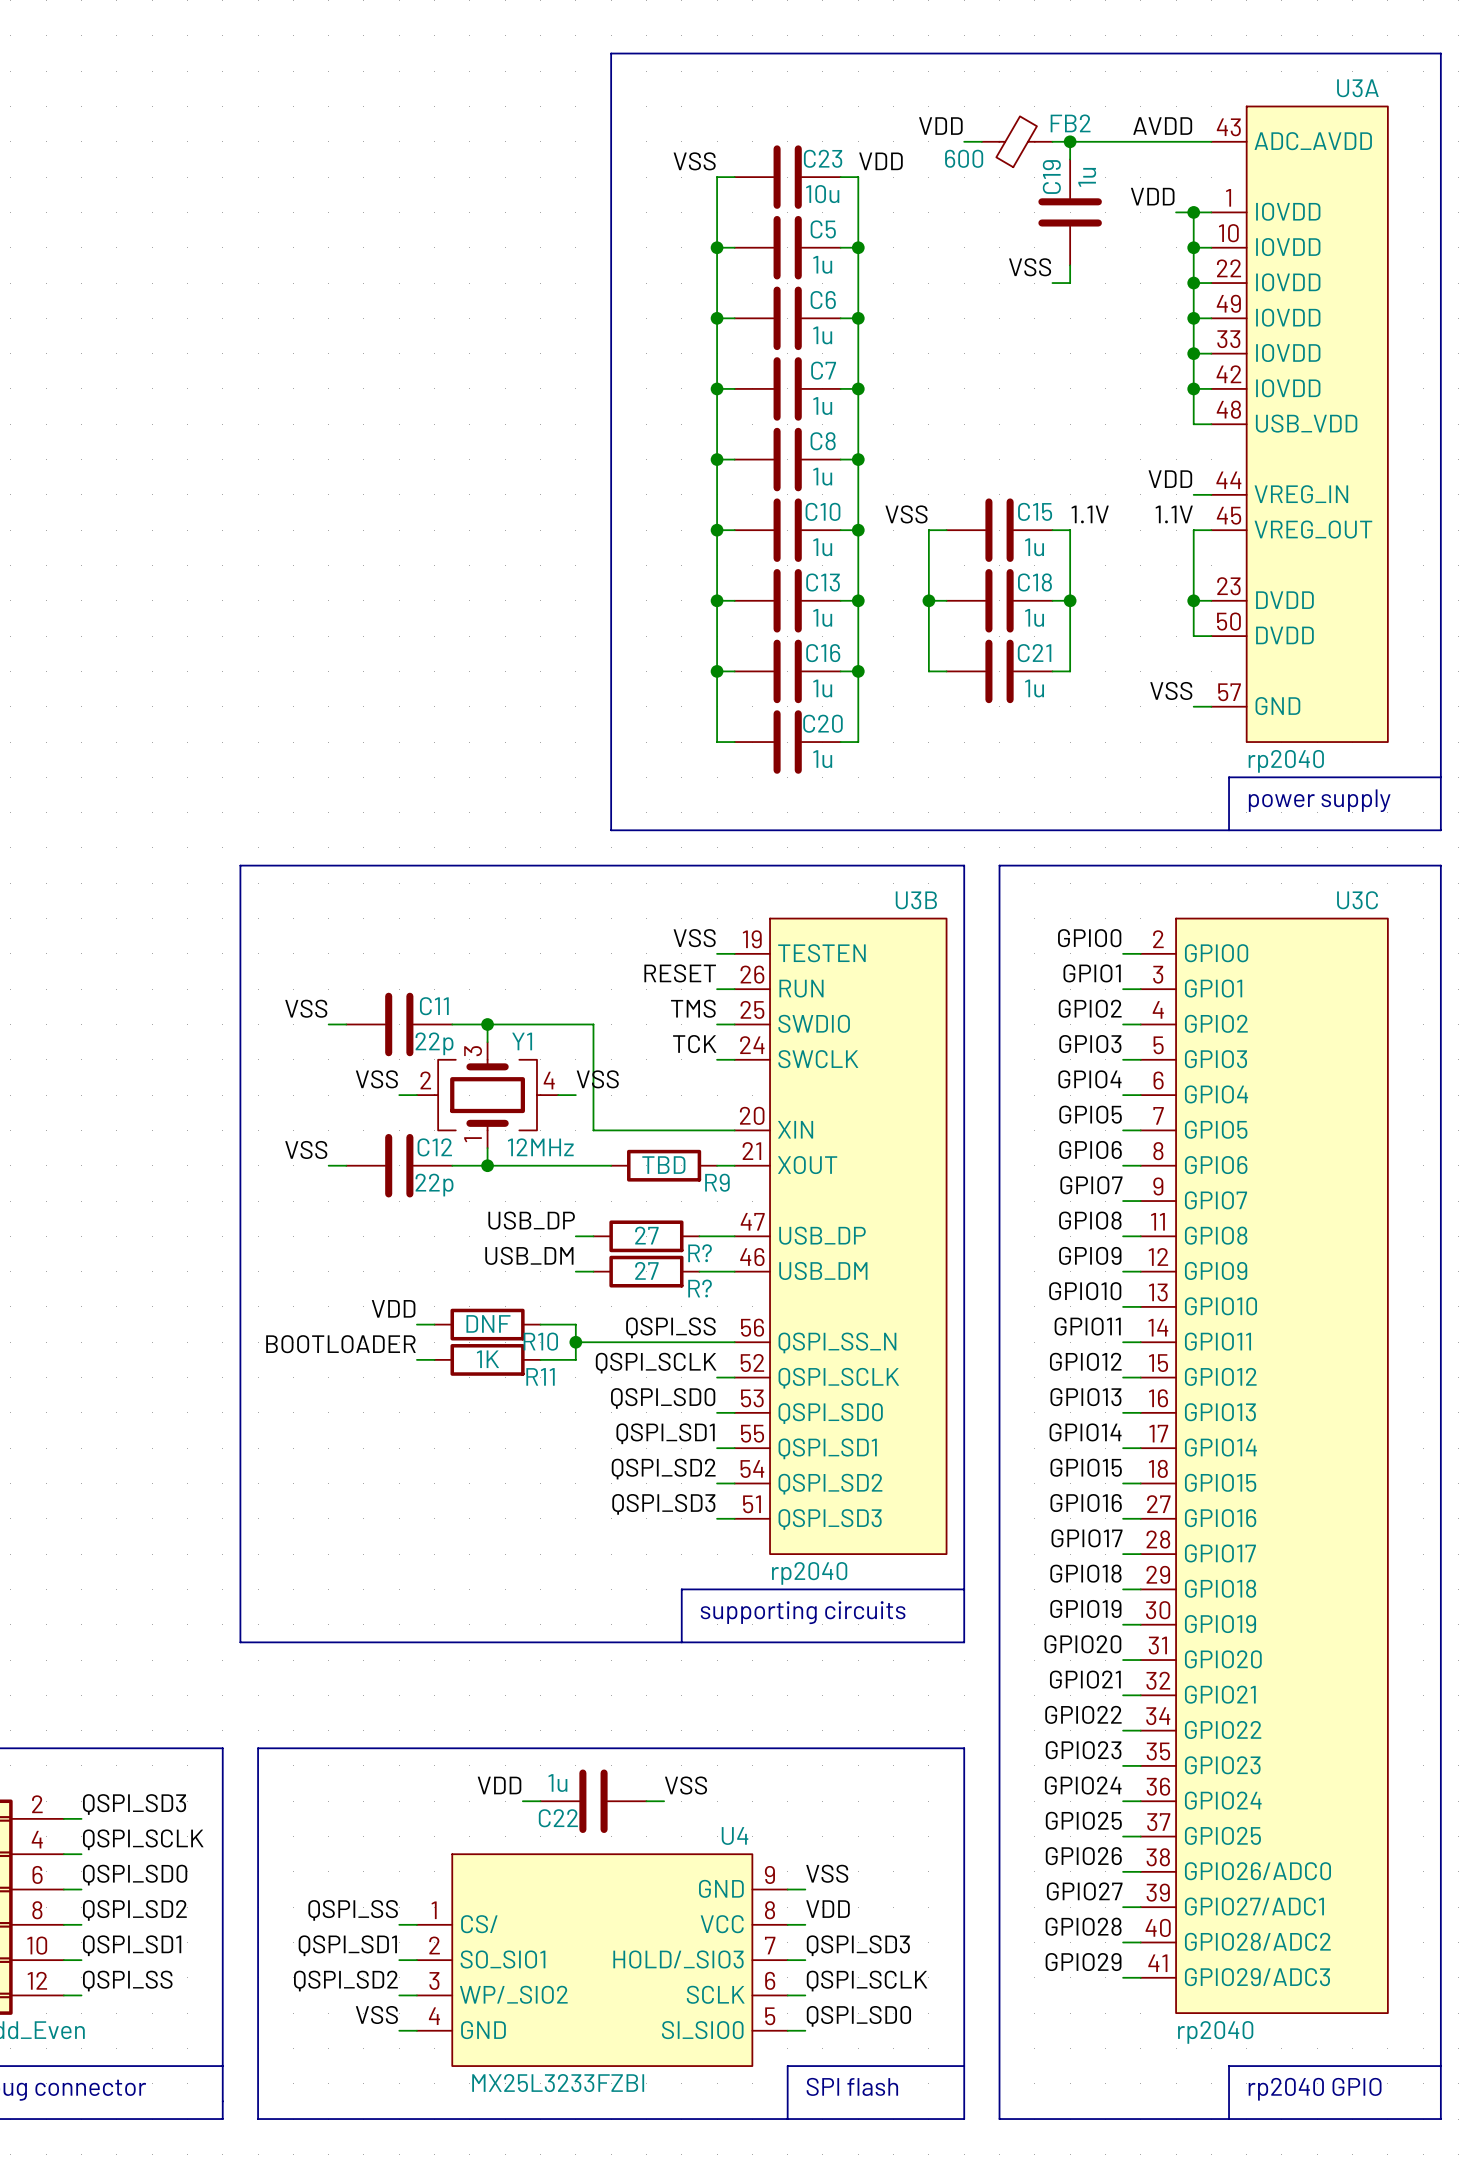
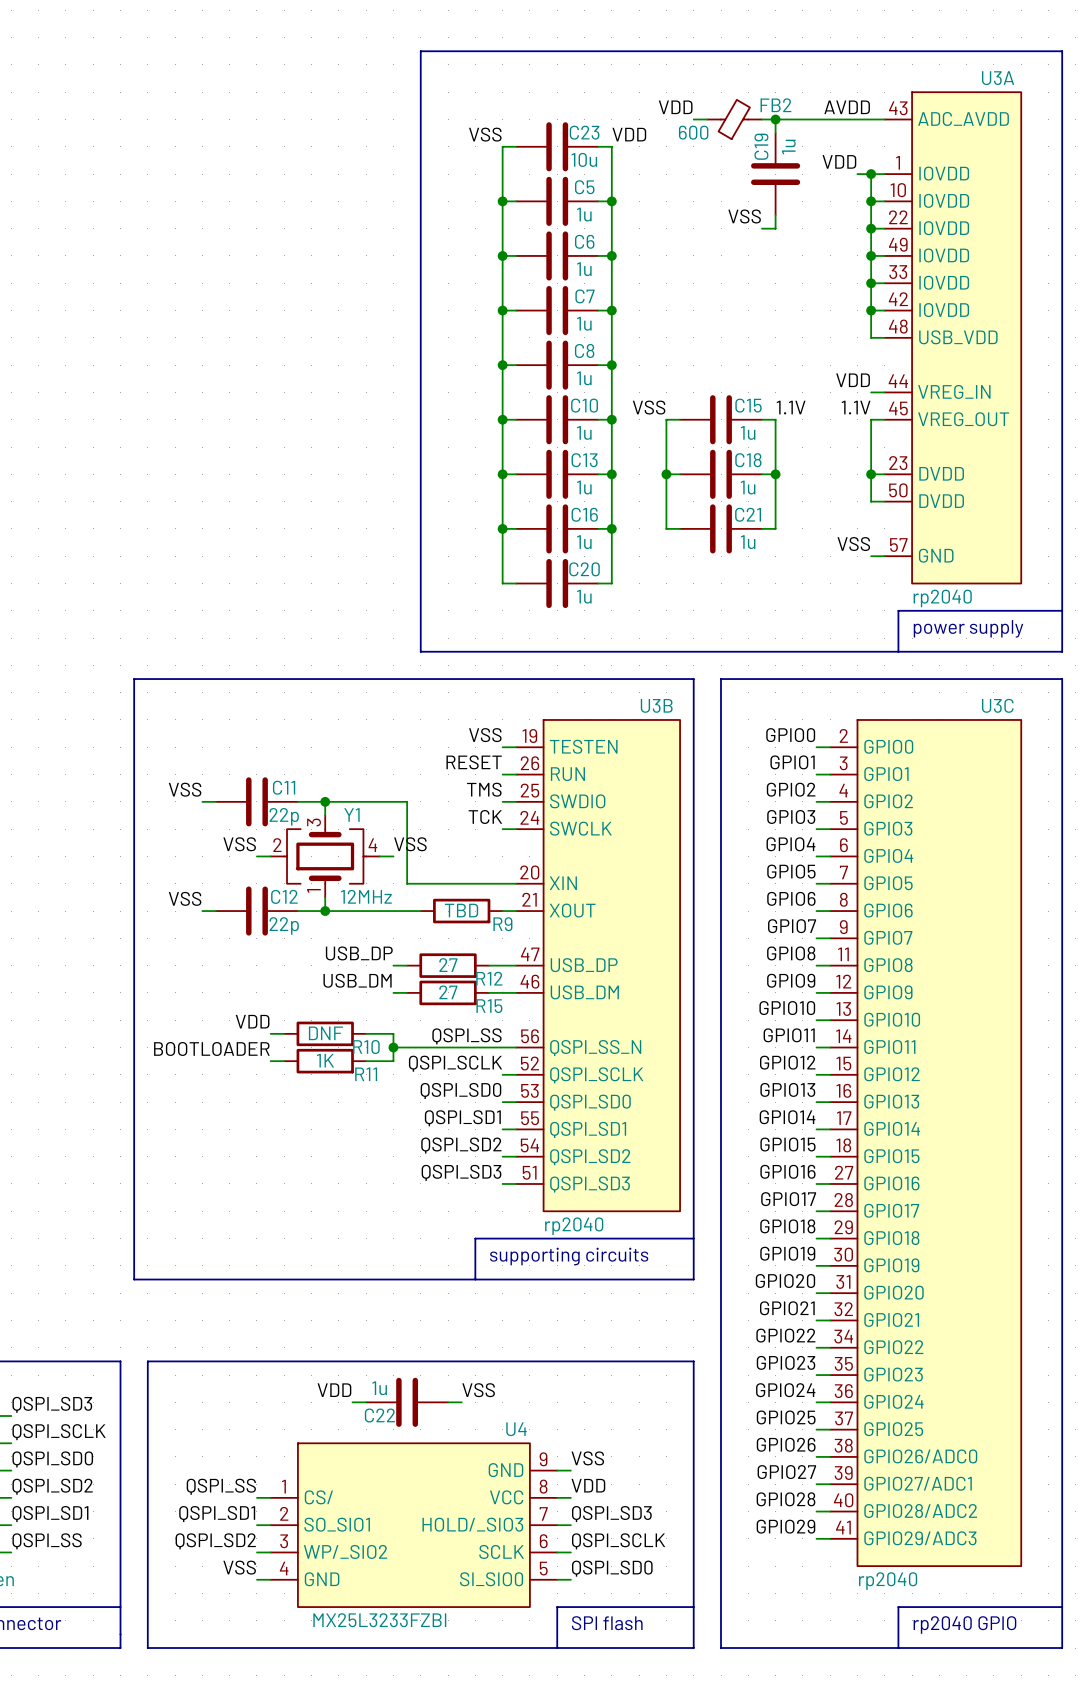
R? name: R? (700, 1253) -> R12 (489, 978)
R? name: R? (700, 1288) -> R15 (489, 1006)

